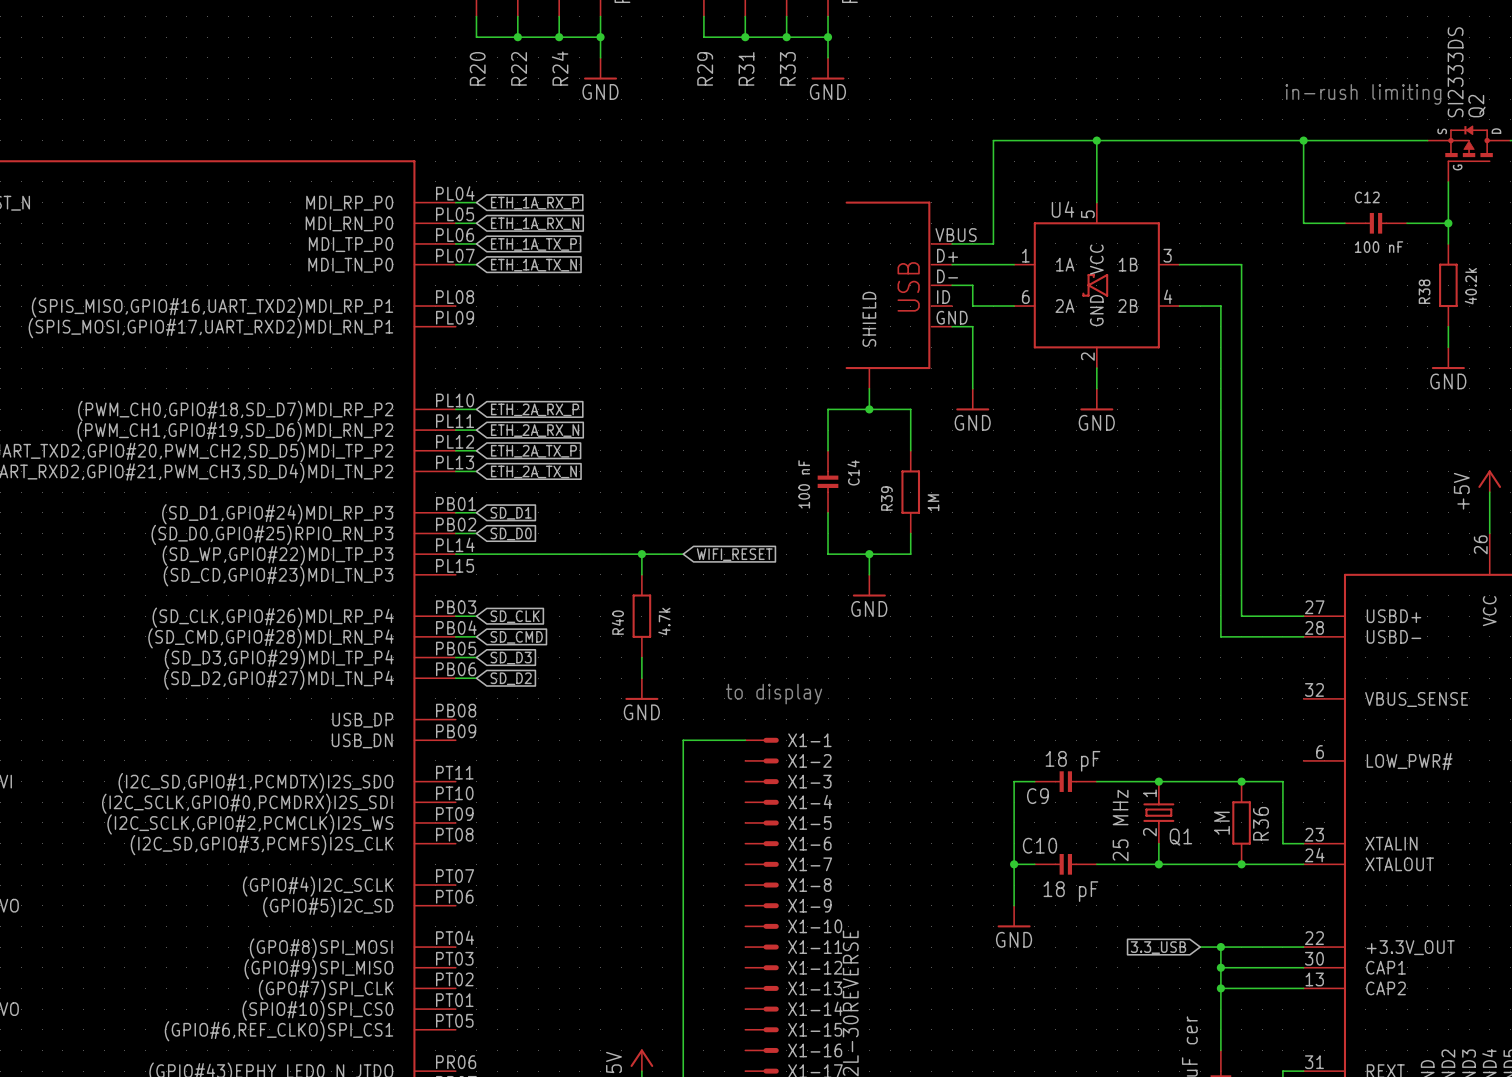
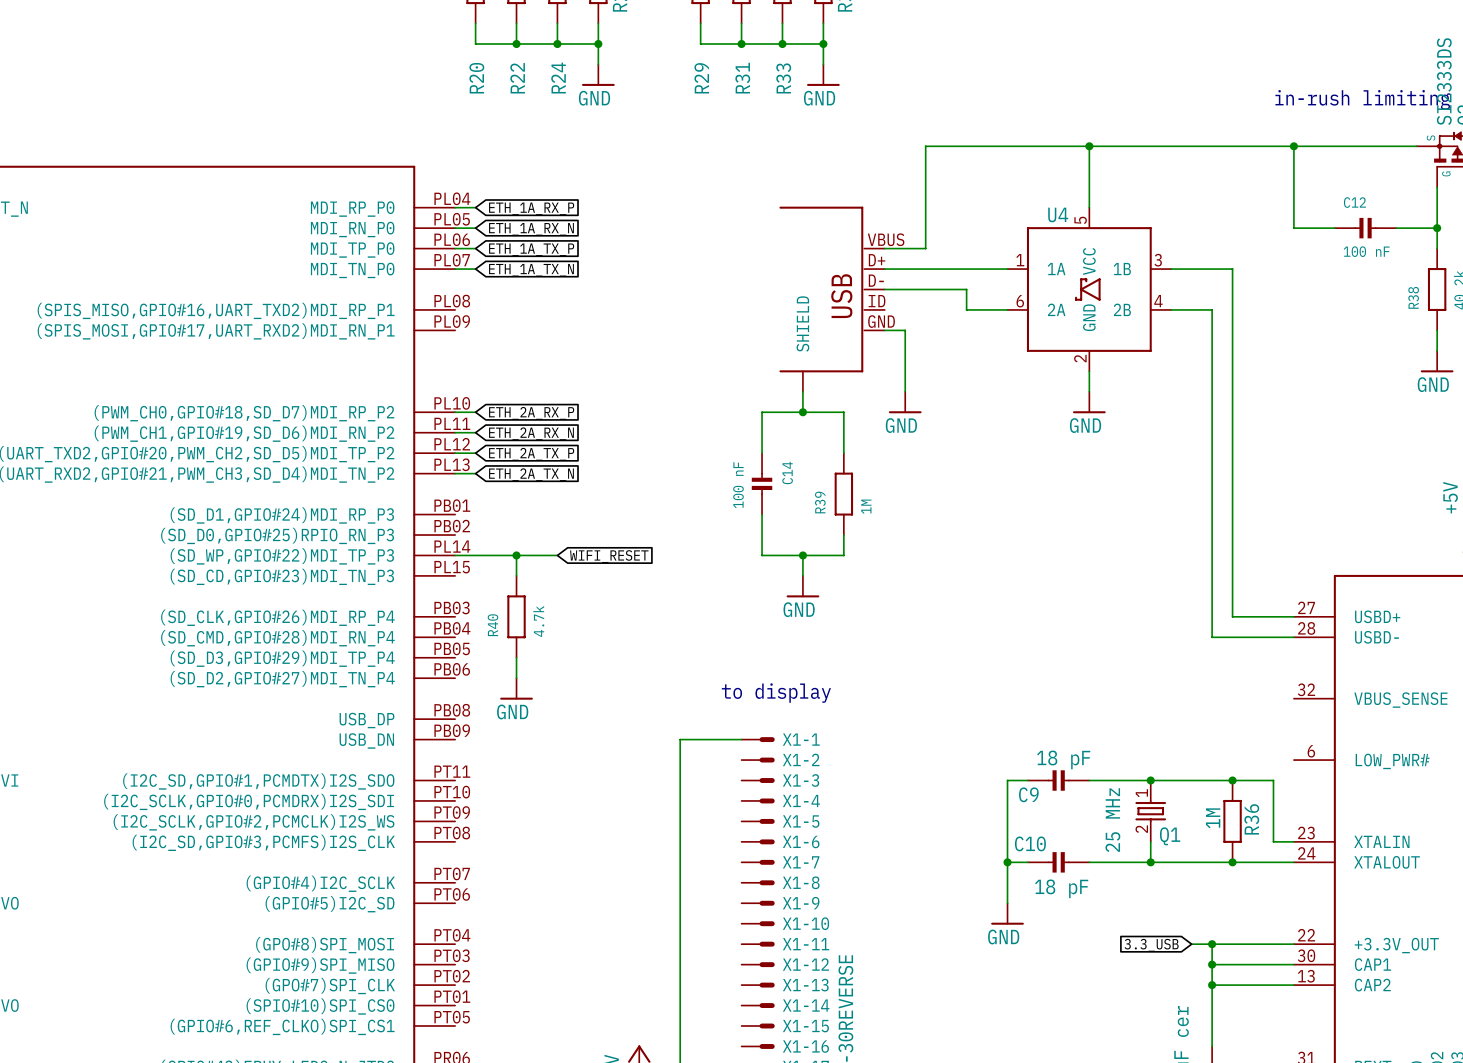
wire: (993, 140) (993, 243) (952, 243) -> (987, 146) (925, 146) (925, 248) (884, 248)
wire: none -> (884, 269) (946, 269)
wire: none -> (884, 289) (946, 289)
part position: (898, 295) -> (832, 299)
wire: (952, 326) (972, 326) (972, 388) -> (884, 330) (905, 330) (905, 391)
wire: (869, 388) (869, 409) -> (802, 391) (802, 412)
power symbol position: GND (972, 399) -> GND (905, 402)
junction: none -> (802, 412)
wire: (828, 409) (828, 450) -> (823, 412) (762, 412) (762, 453)
wire: (848, 409) (910, 409) (910, 450) -> (843, 412) (843, 453)
junction: (869, 409) -> none
C14 position: (828, 481) -> (762, 483)
R39 position: (910, 492) -> (843, 494)
wire: (455, 512) (476, 512) -> none
wire: (828, 512) (828, 554) -> (762, 514) (762, 555) (823, 555)
global label: SD_D1 (511, 513) -> none
wire: (455, 533) (476, 533) -> none
global label: SD_D0 (511, 533) -> none
wire: (910, 533) (910, 554) (848, 554) -> (843, 535) (843, 555)
junction: none -> (516, 555)
wire: (559, 554) (683, 554) -> none
wire: (641, 554) (641, 574) -> (516, 555) (516, 575)
junction: (641, 554) -> none
global label position: WIFI_RESET (734, 554) -> WIFI_RESET (609, 556)
junction: none -> (802, 555)
wire: (869, 554) (869, 574) -> (802, 555) (802, 575)
junction: (869, 554) -> none
power symbol position: GND (869, 585) -> GND (802, 586)
wire: (455, 616) (476, 616) -> none
global label: SD_CLK (515, 616) -> none
R40 position: (641, 616) -> (516, 616)
wire: (455, 636) (476, 636) -> none
global label: SD_CMD (516, 637) -> none
wire: (455, 657) (476, 657) -> none
wire: (641, 657) (641, 678) -> (516, 657) (516, 678)
global label: SD_D3 (511, 658) -> none
wire: (455, 678) (476, 678) -> none
global label: SD_D2 (511, 678) -> none
power symbol: none -> GND (516, 688)
power symbol: GND (641, 689) -> none

